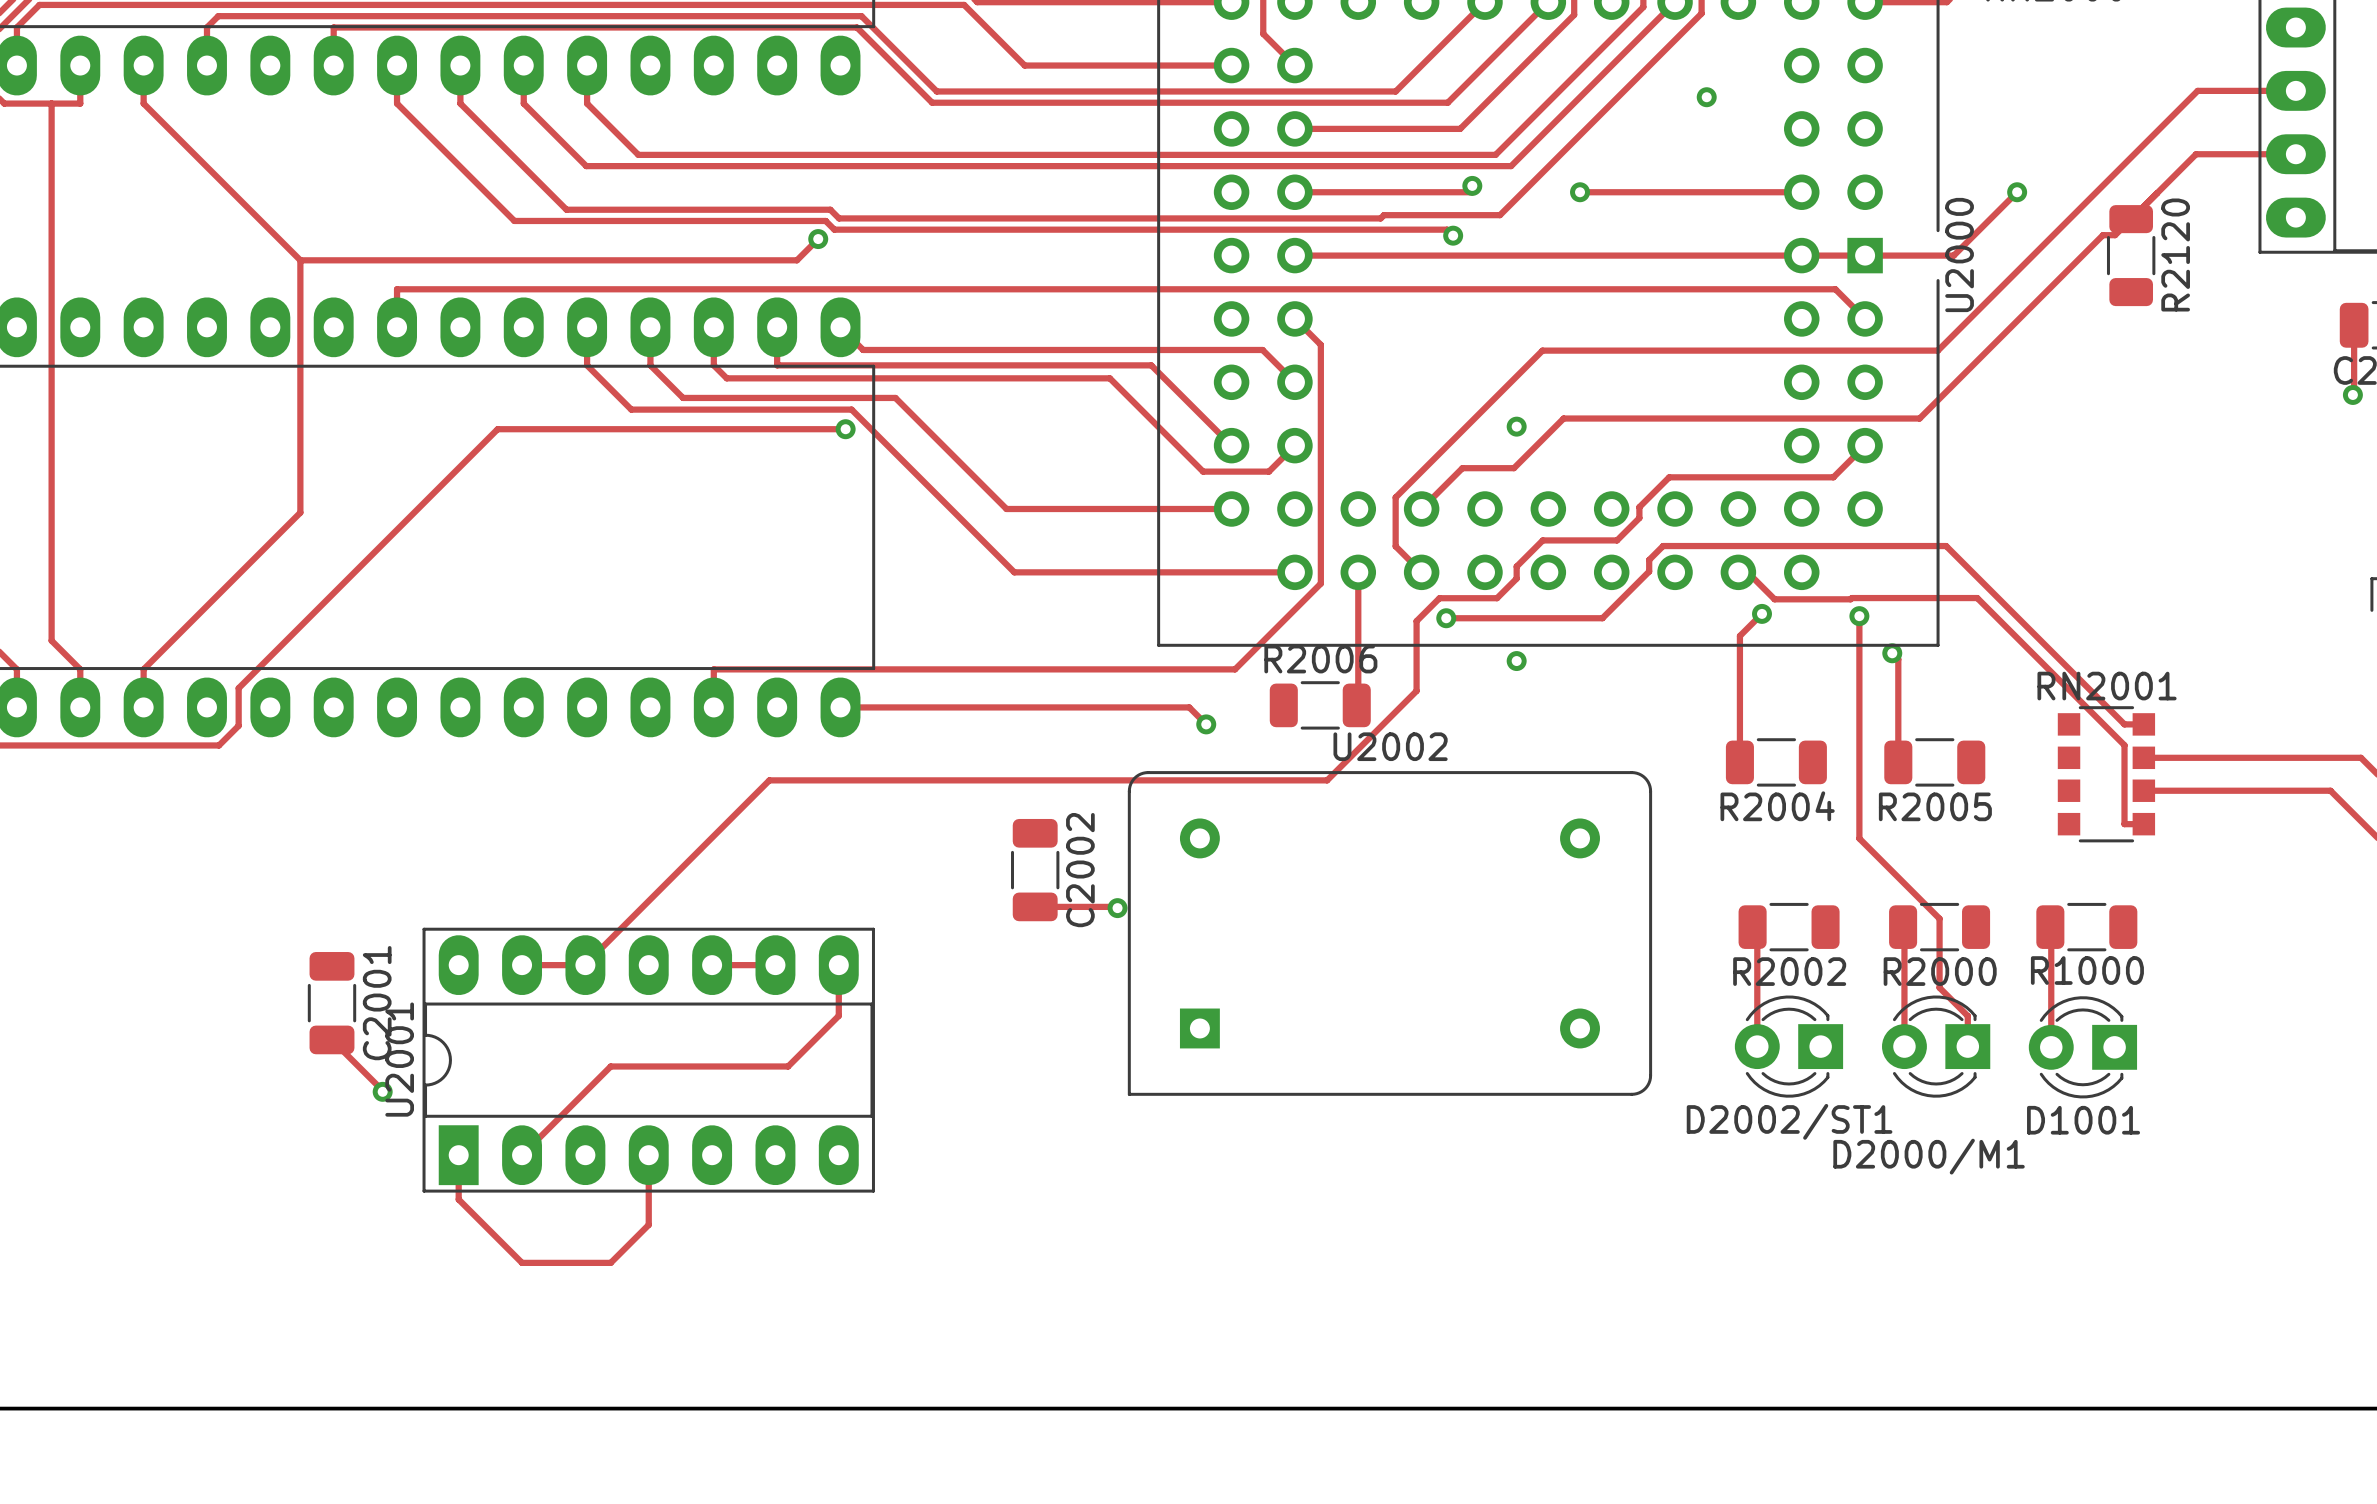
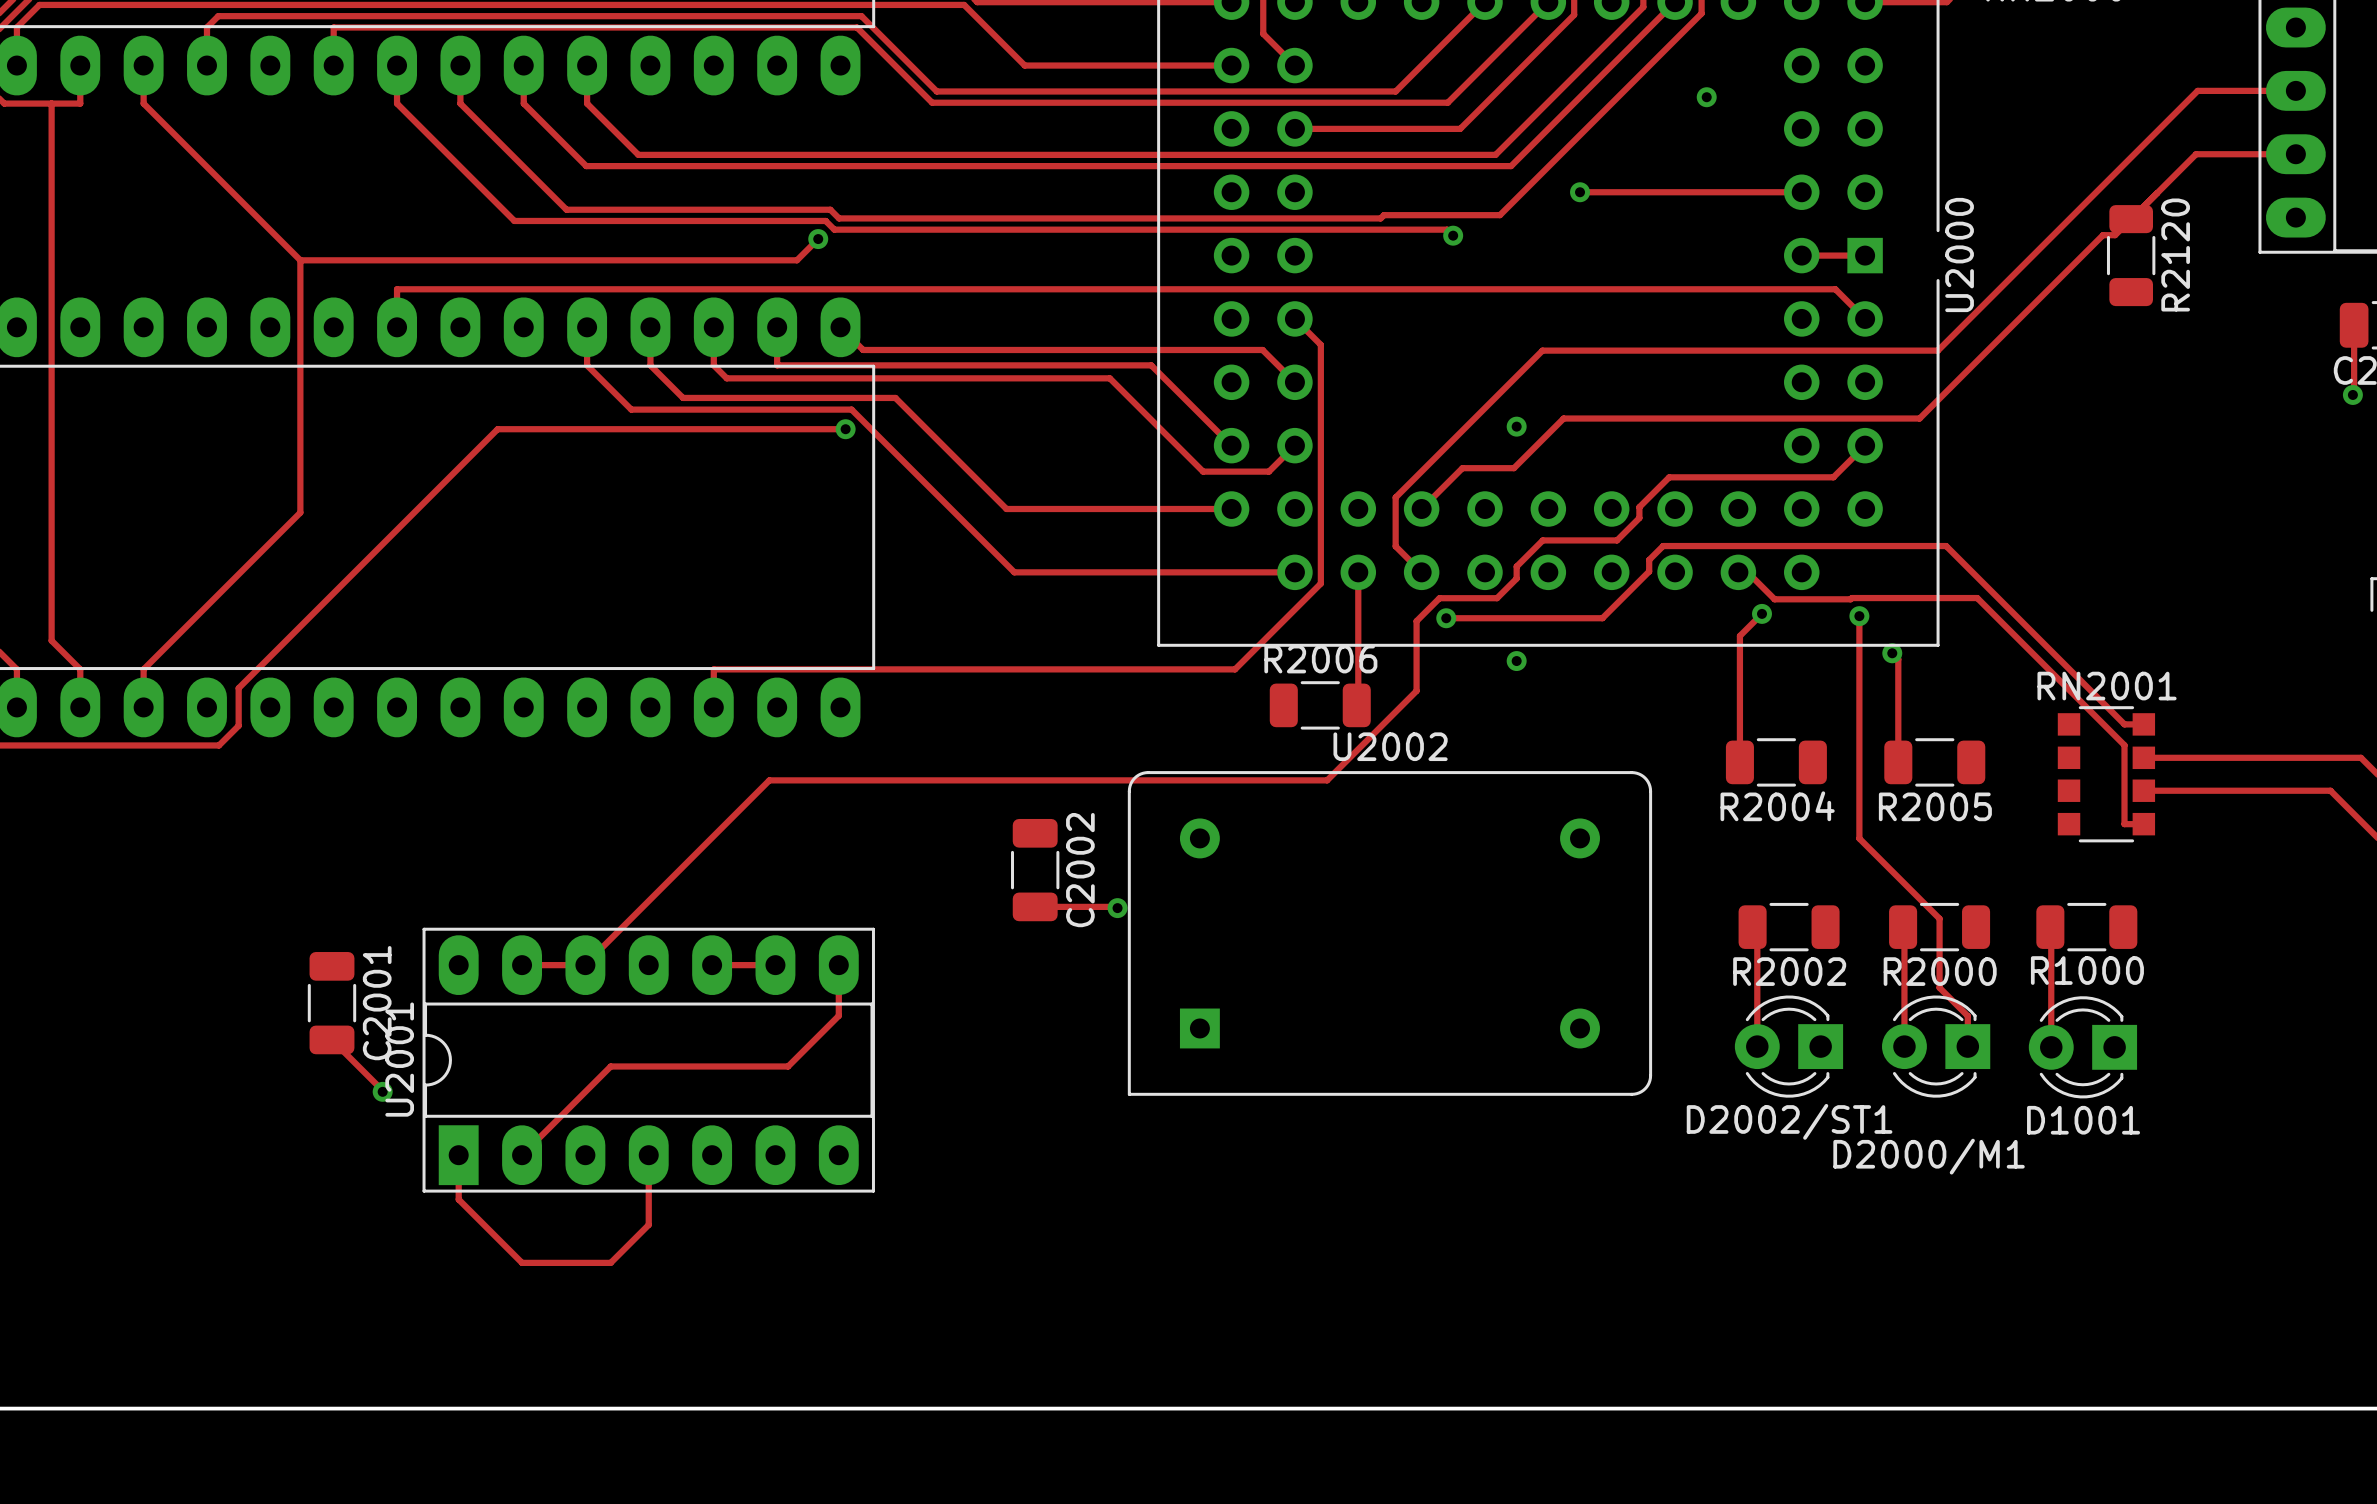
track: (1472, 185) (1472, 192) (1294, 192) -> none
via: (1472, 185) -> none
track: (2017, 192) (1953, 255) (1865, 255) -> none
via: (2017, 192) -> none
track: (1294, 255) (1801, 255) -> none
track: (840, 707) (1189, 707) (1206, 724) -> none
via: (1206, 724) -> none

